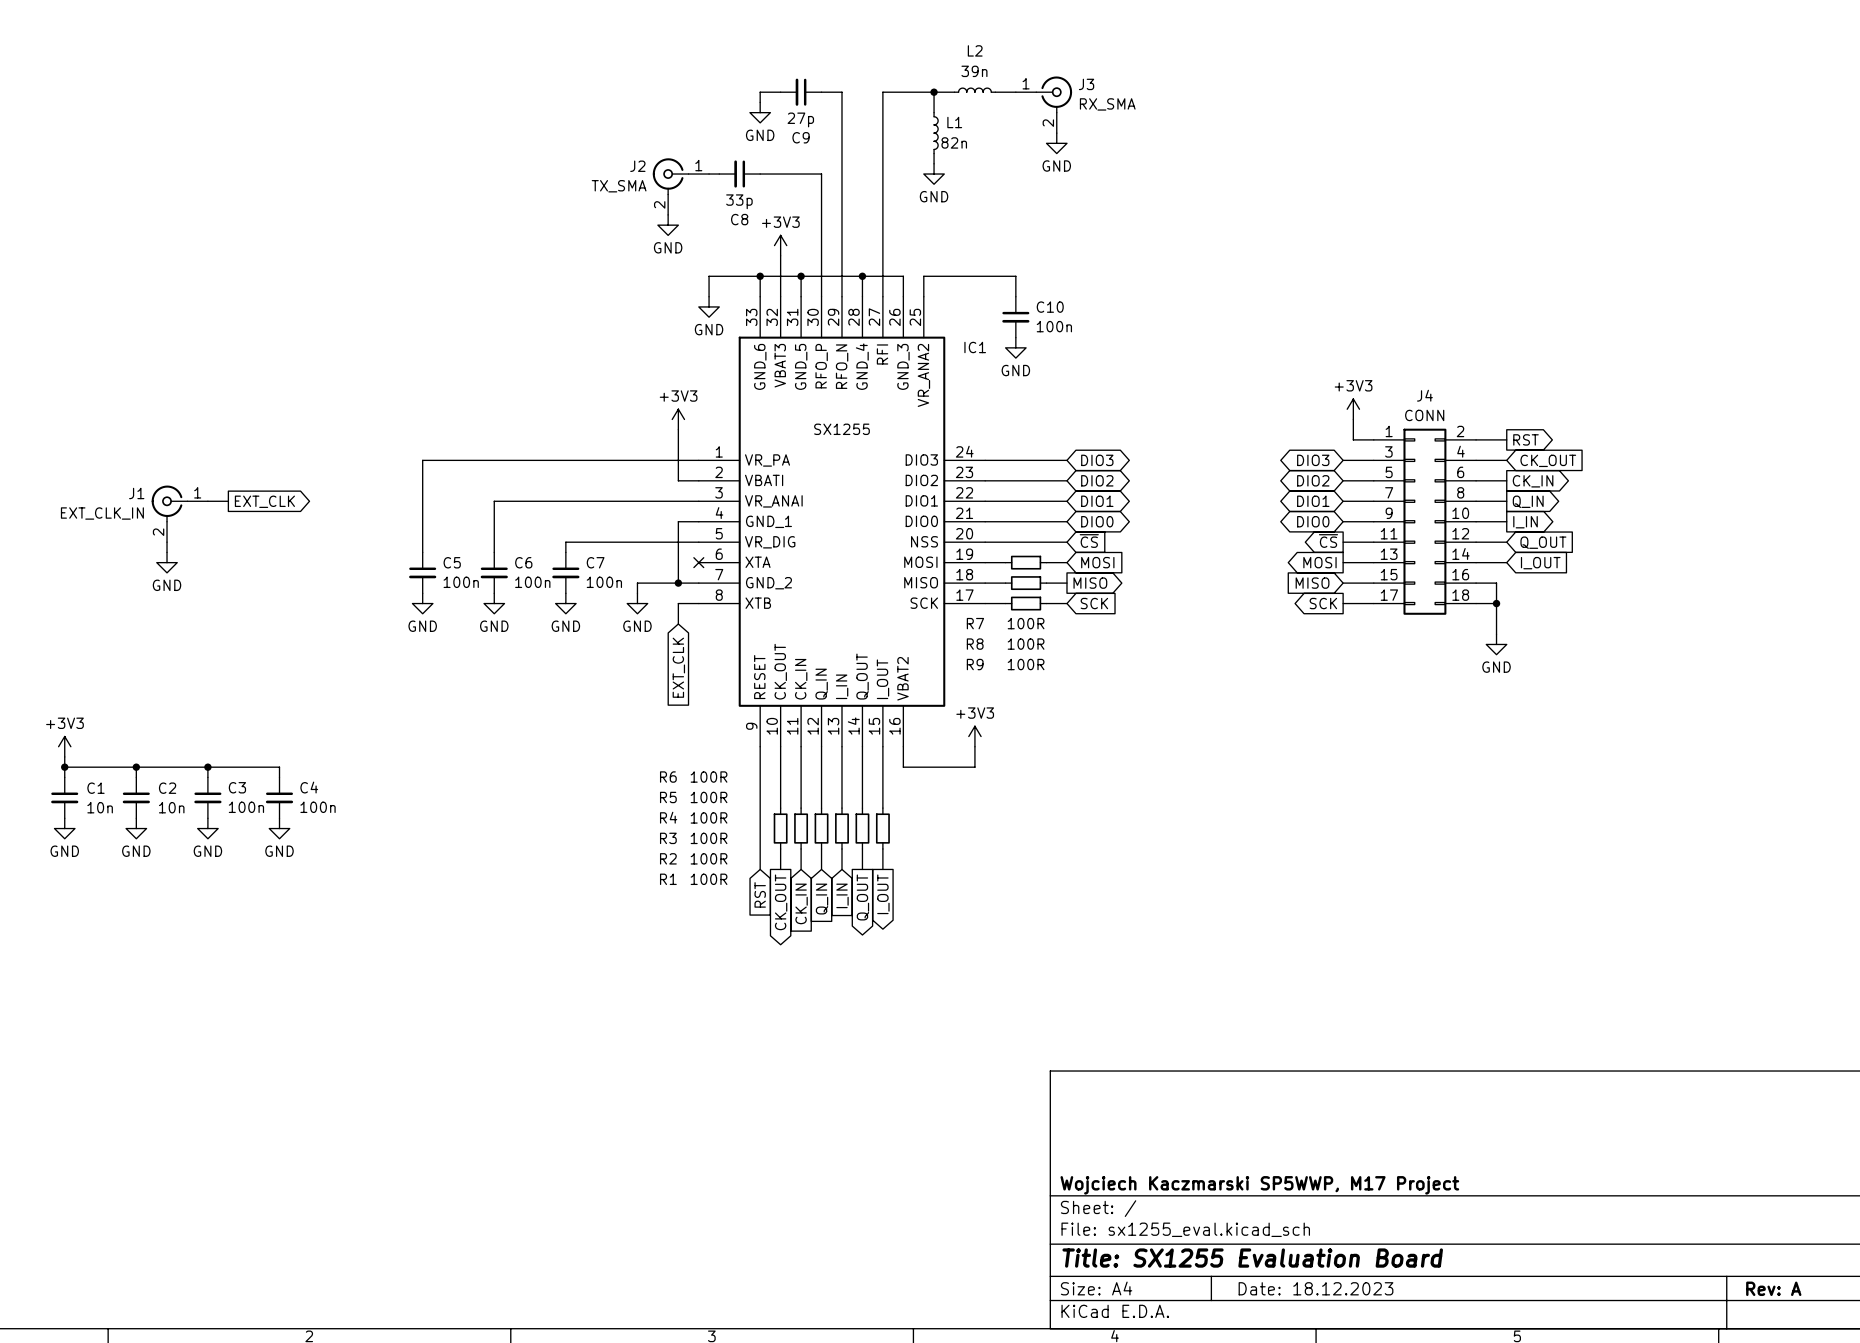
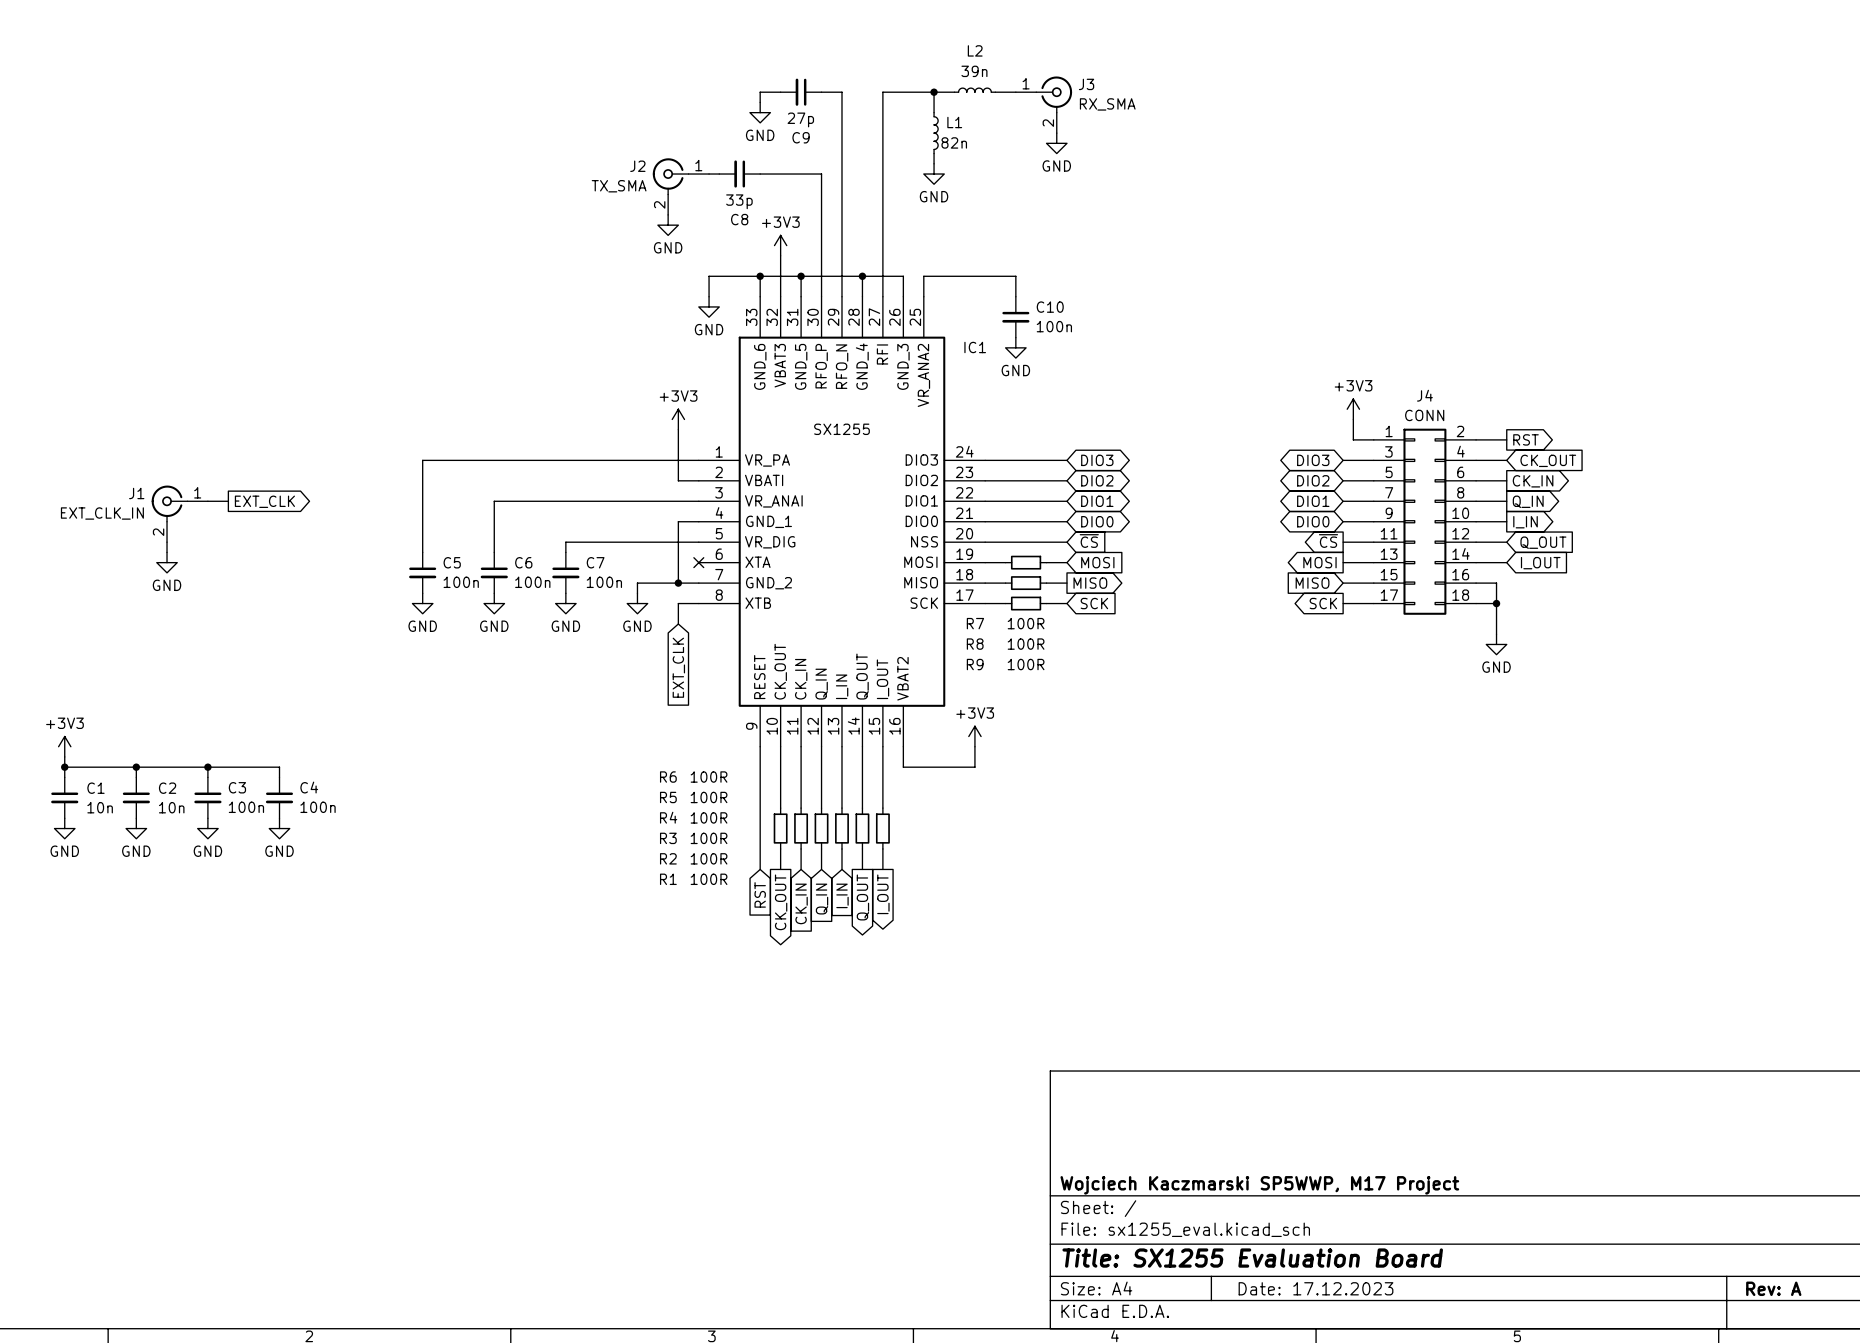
title block: Date: 18.12.2023 (1316, 1288) -> Date: 17.12.2023 (1316, 1288)

